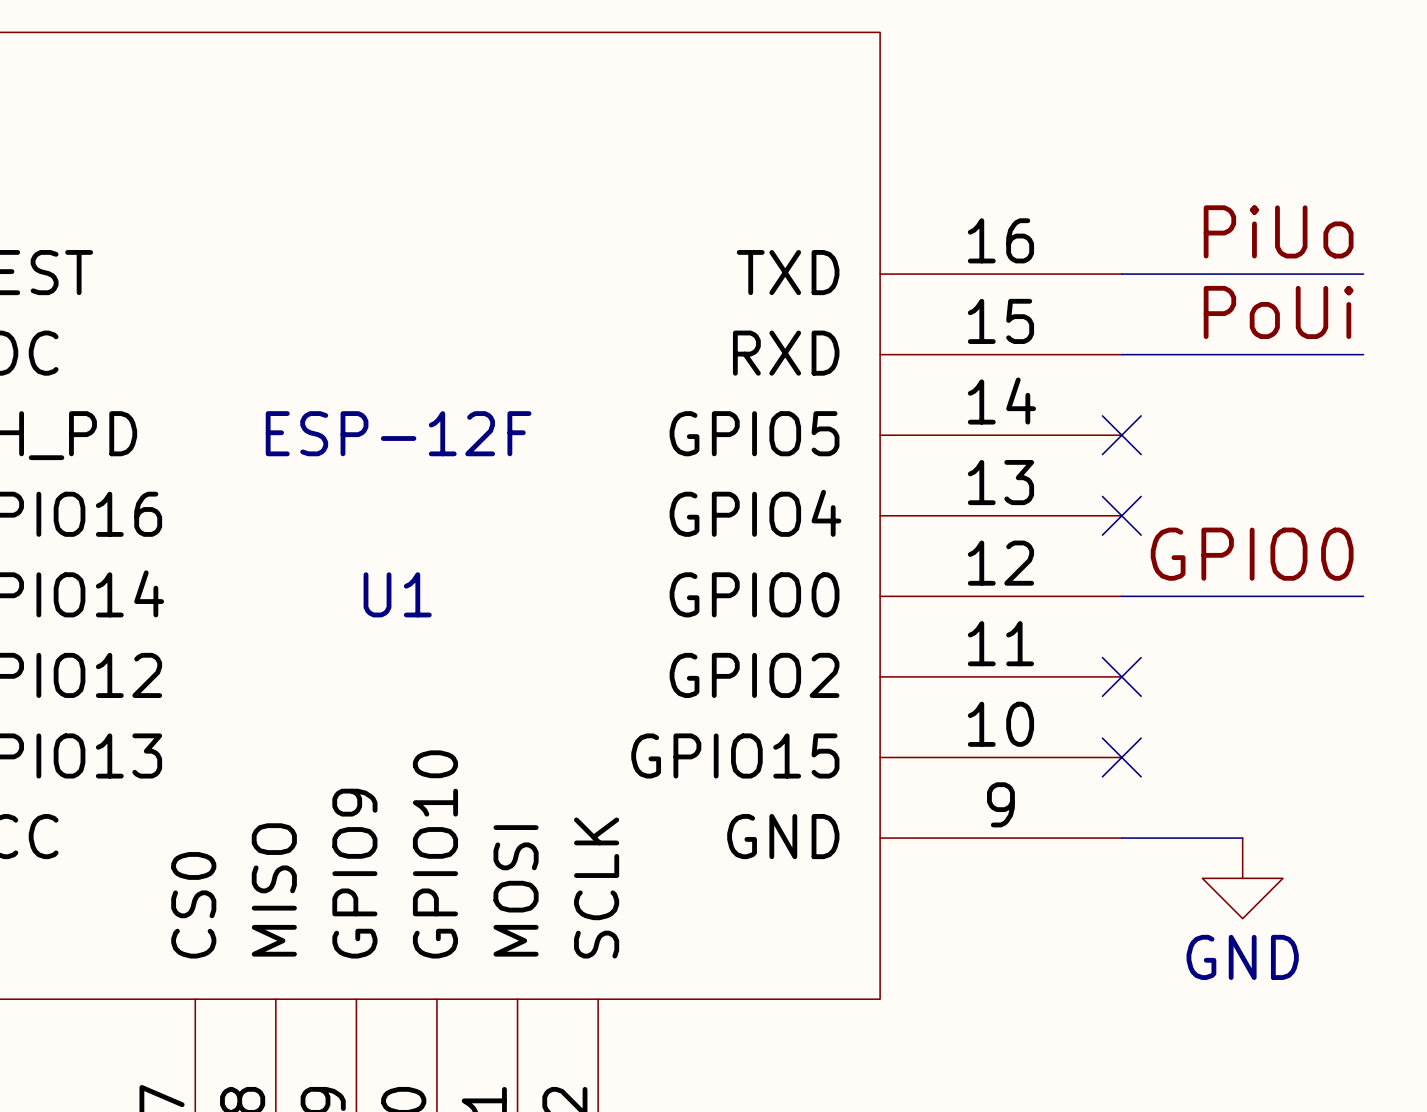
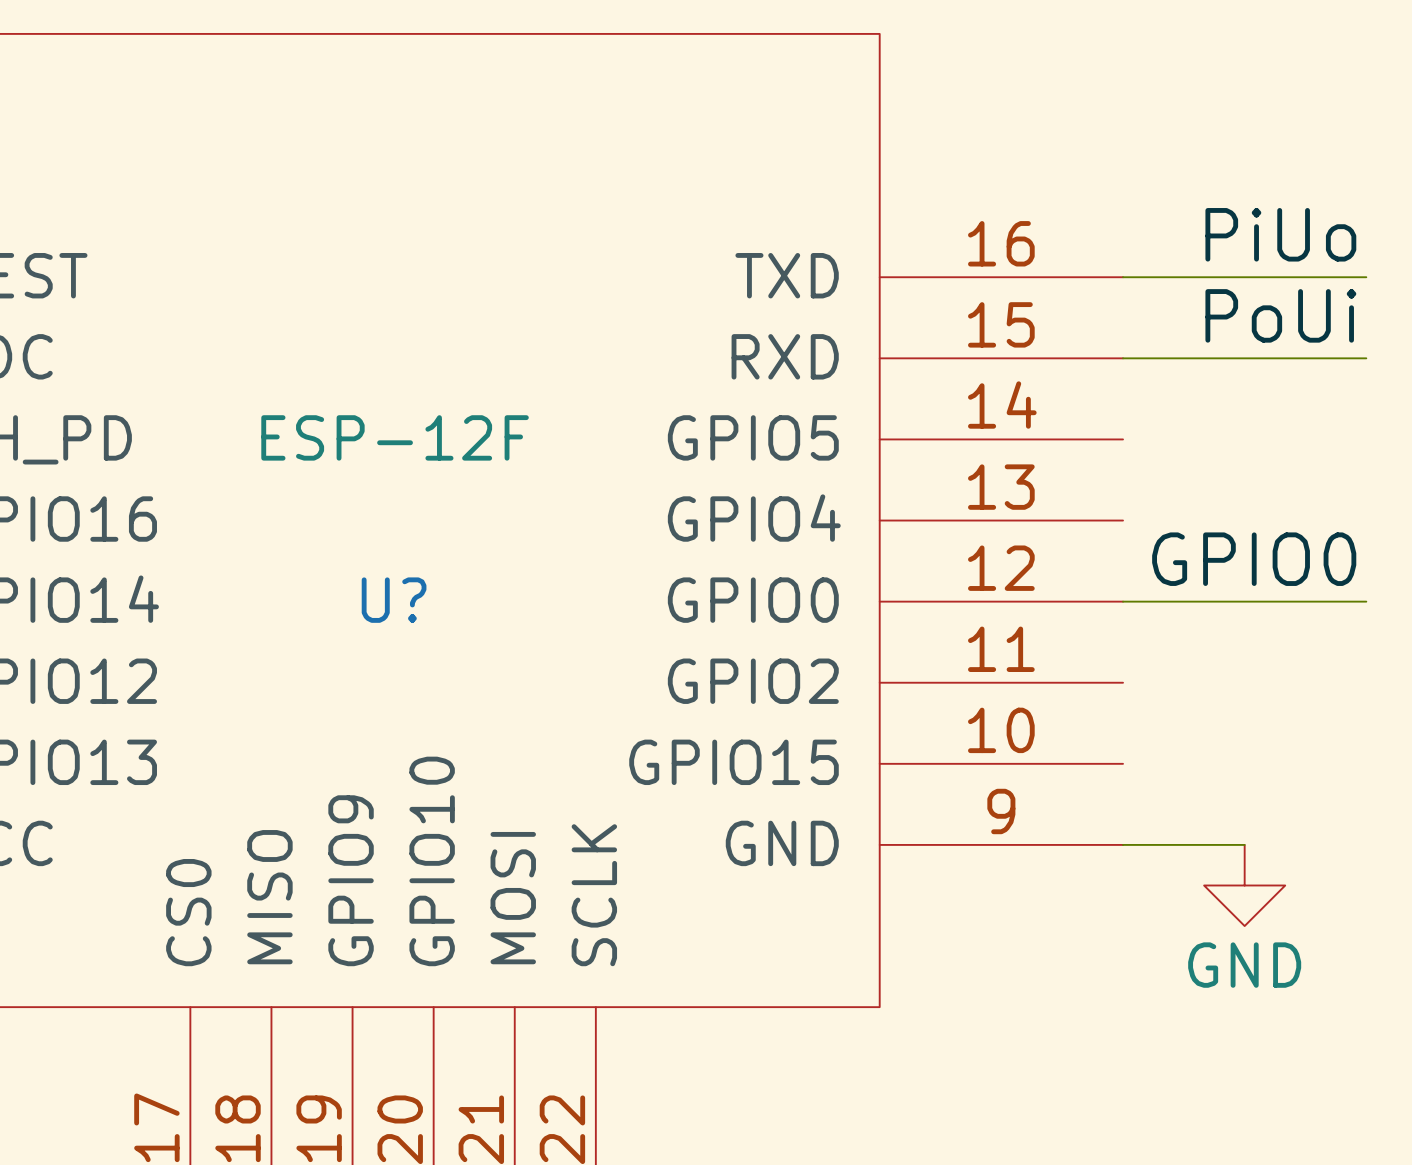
no-connect mark: (1121, 435) -> none
no-connect mark: (1121, 515) -> none
U1 name: U1 (397, 594) -> U? (394, 600)
no-connect mark: (1121, 676) -> none
no-connect mark: (1121, 757) -> none

